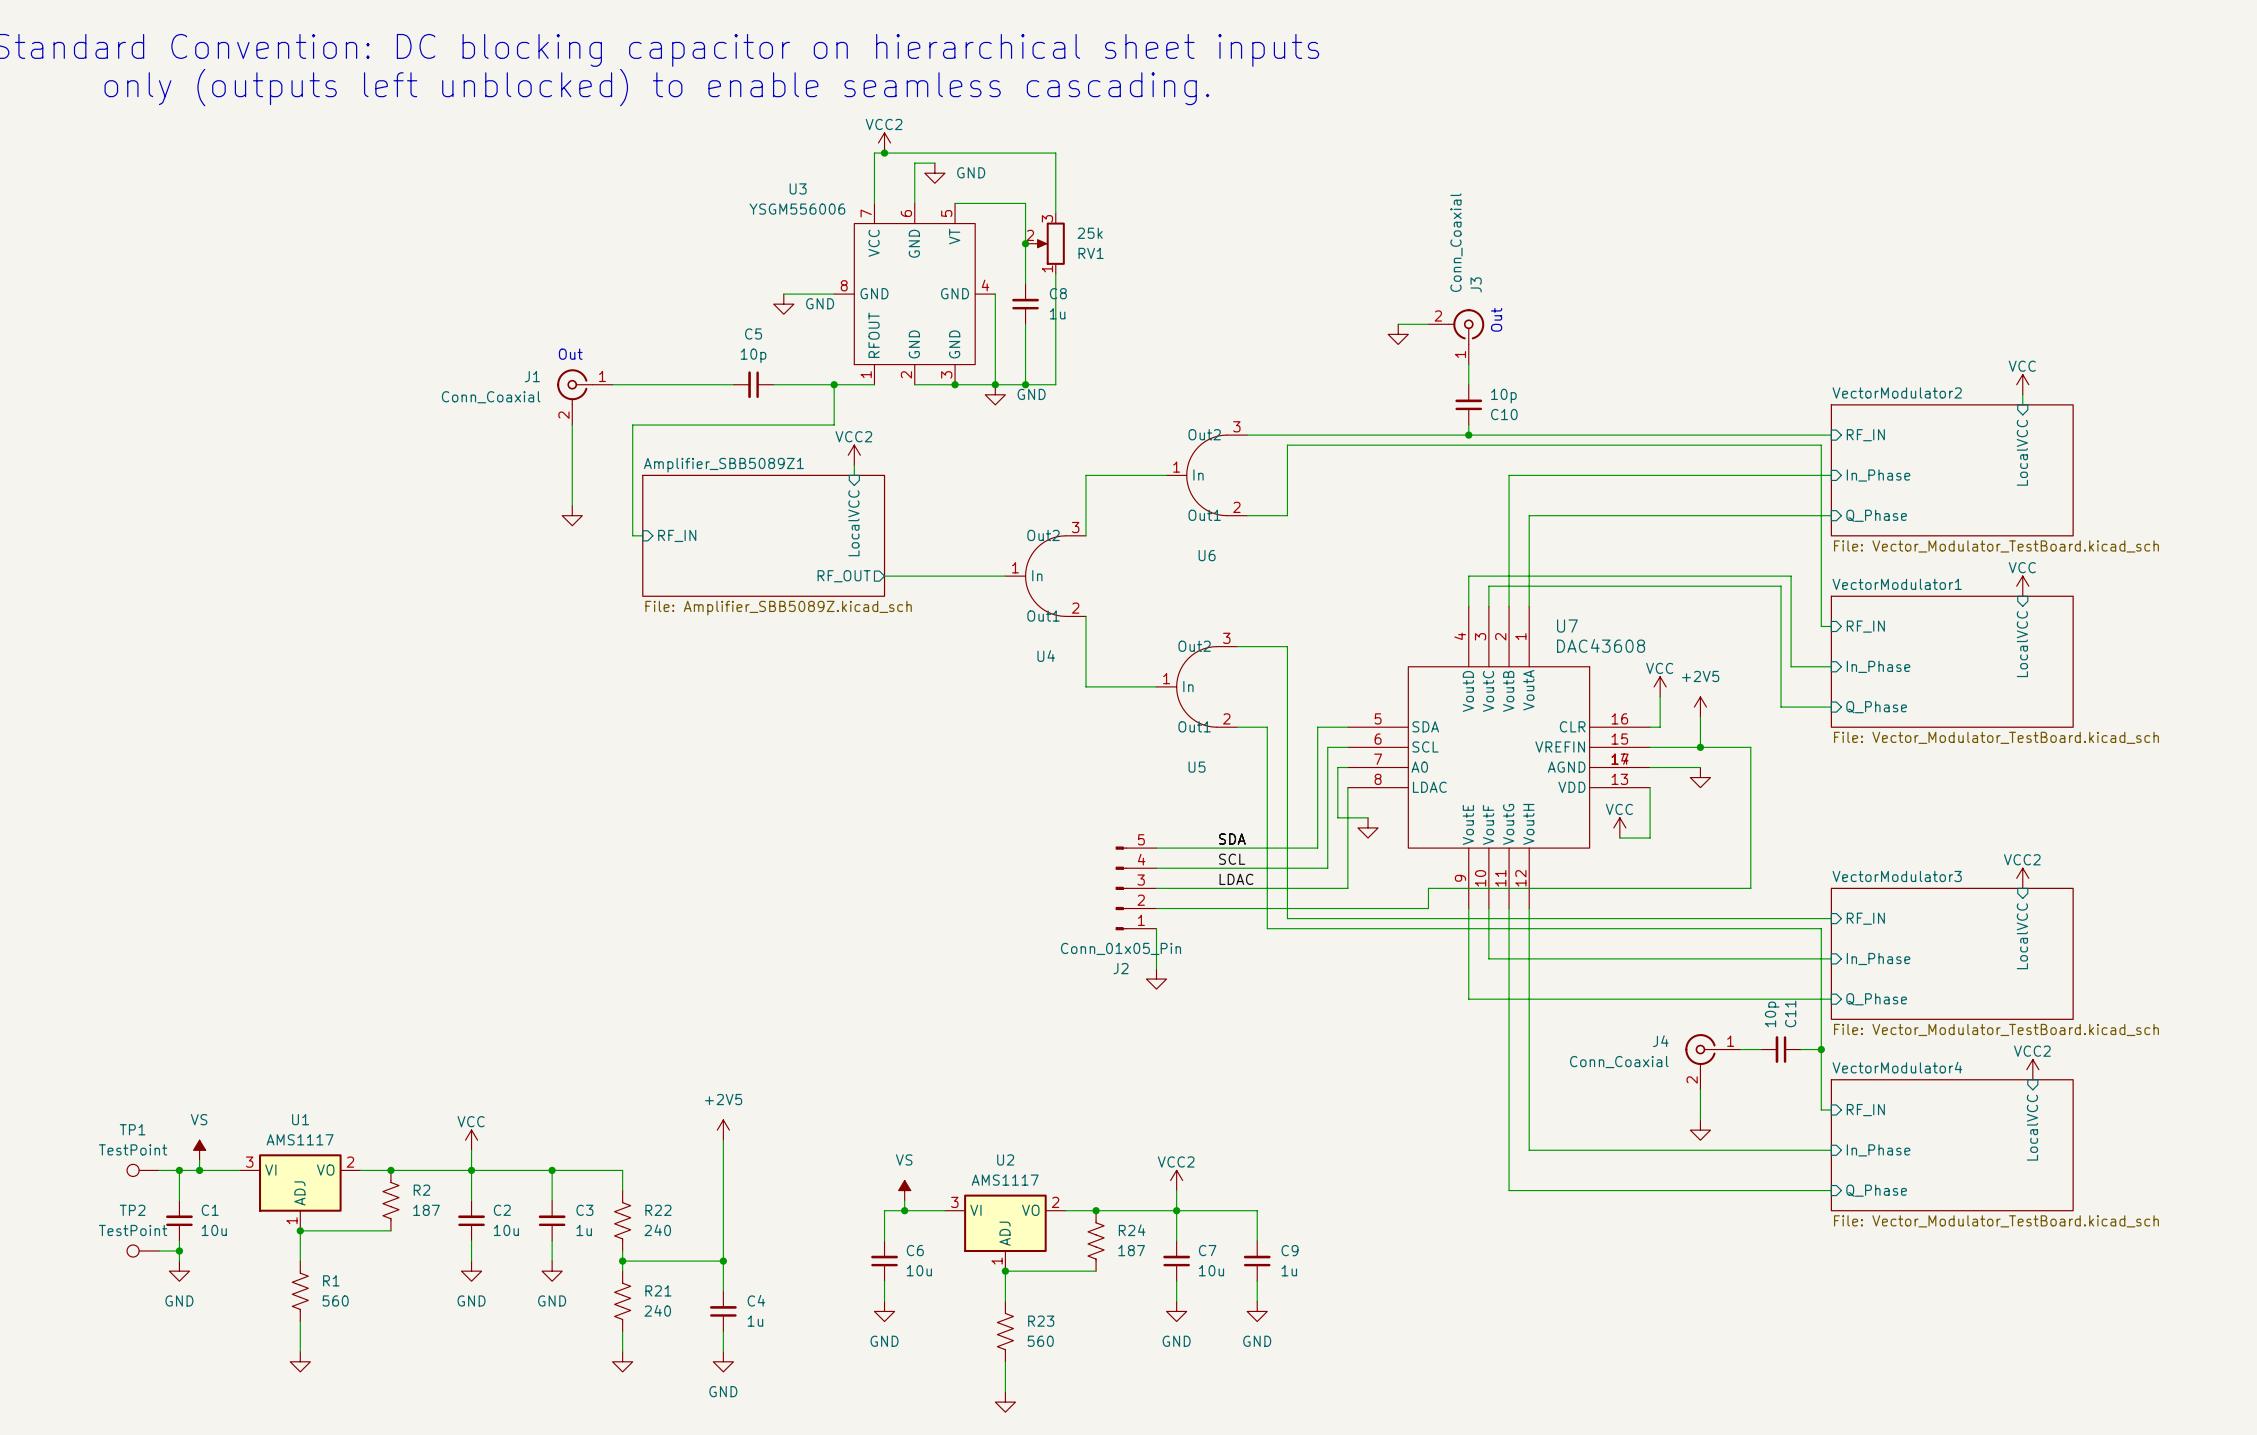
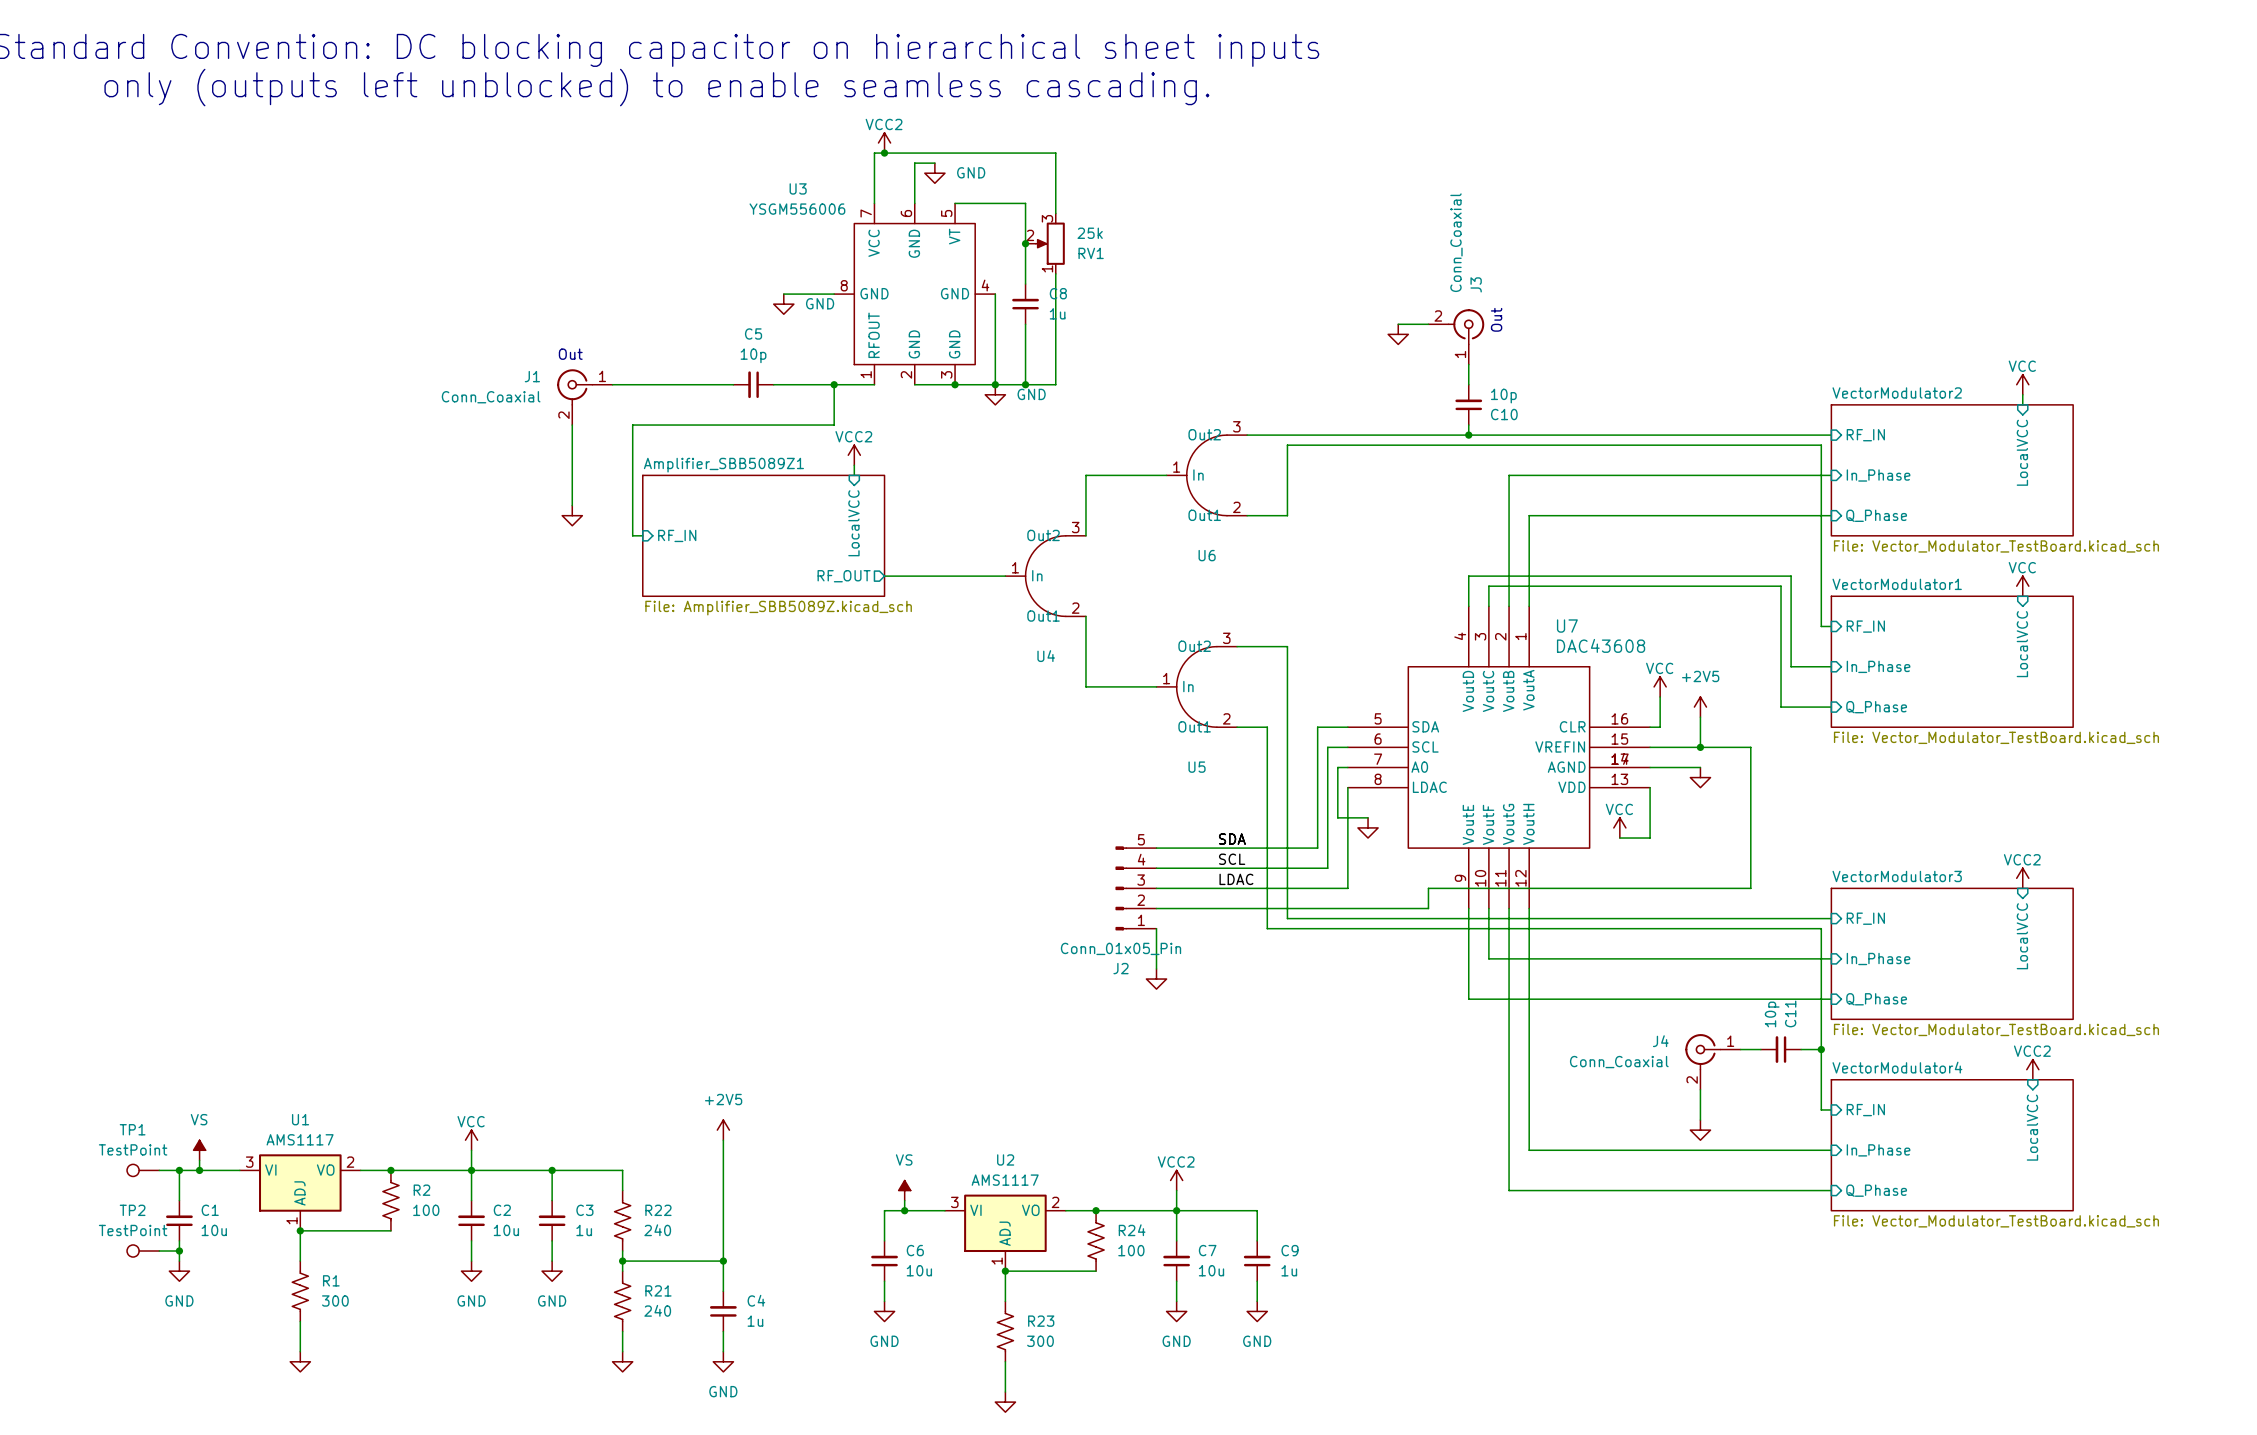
R2 value: 187 (426, 1210) -> 100 (426, 1210)
R24 value: 187 (1131, 1250) -> 100 (1131, 1250)
R1 value: 560 (335, 1300) -> 300 (335, 1300)
R23 value: 560 (1040, 1341) -> 300 (1040, 1341)

